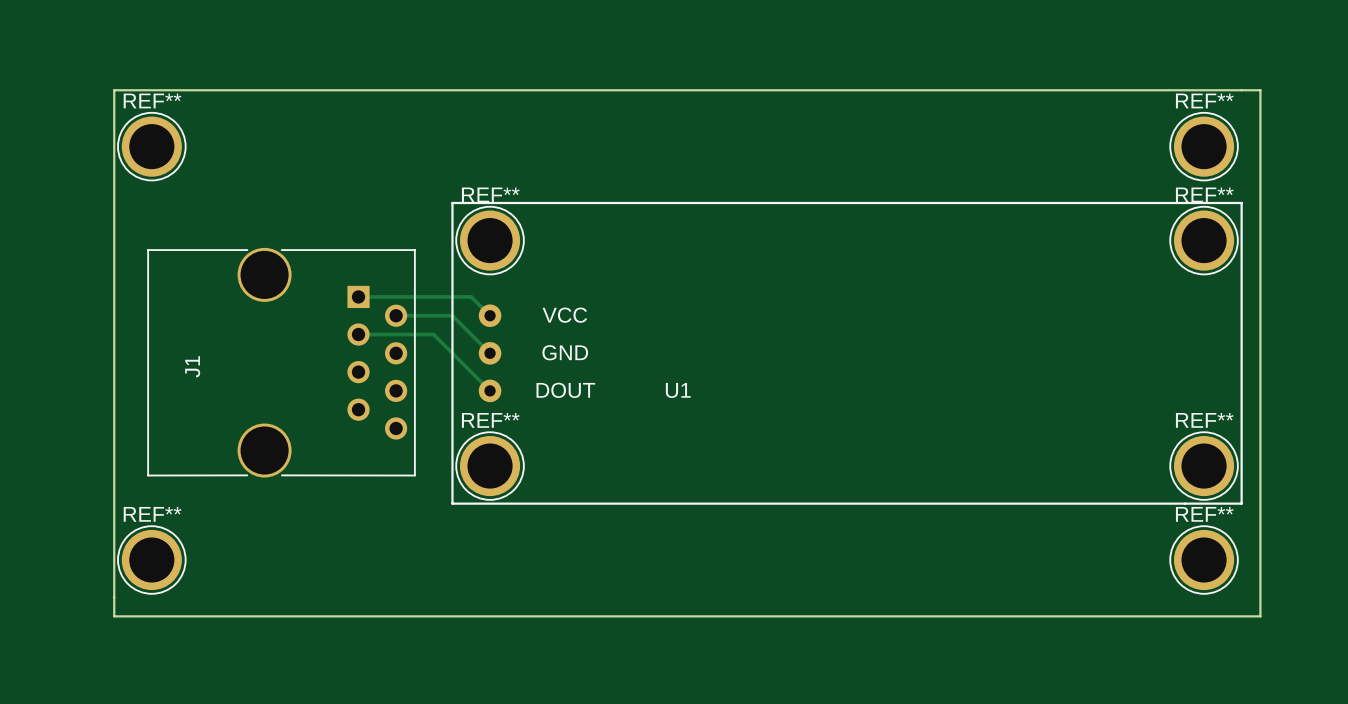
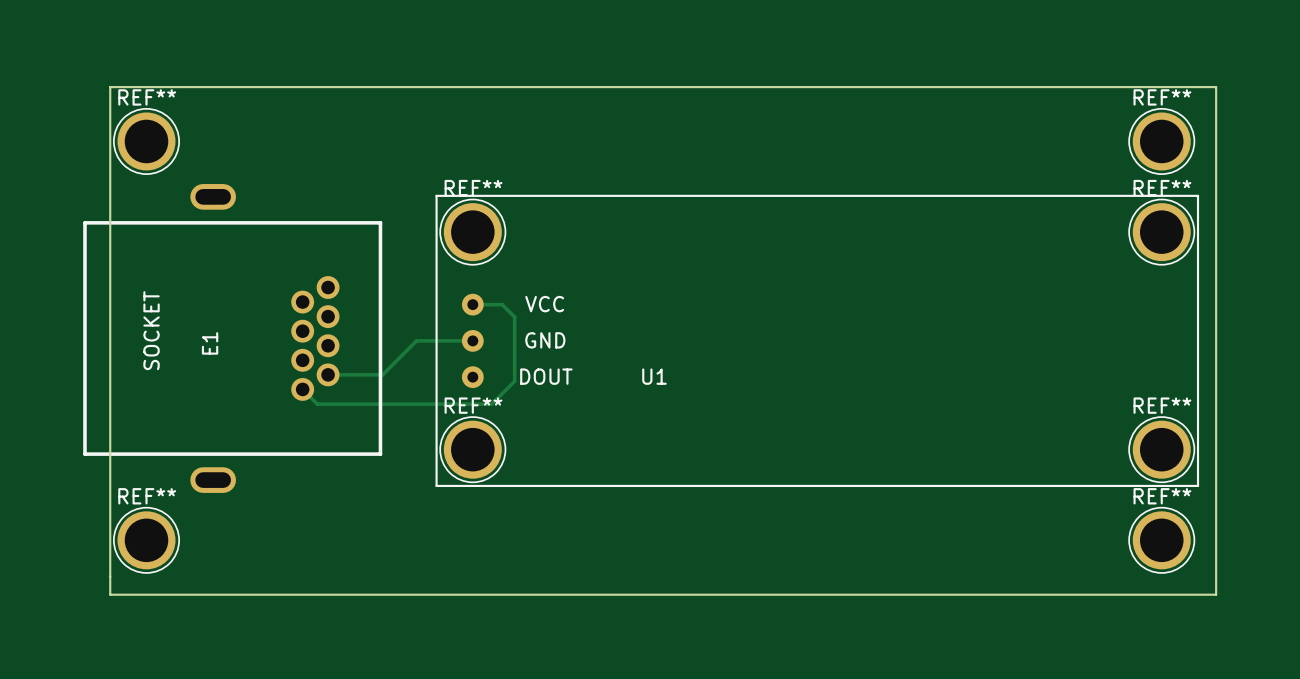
track: (358, 296) (471, 296) (490, 315) -> (302, 389) (317, 404) (491, 404) (514, 381) (514, 317) (502, 304) (472, 304)
track: (396, 315) (452, 315) (490, 353) -> (328, 374) (382, 374) (416, 340) (472, 340)
track: (358, 334) (433, 334) (490, 390) -> none
E1: none -> (232, 338)
J1: (281, 362) -> none

